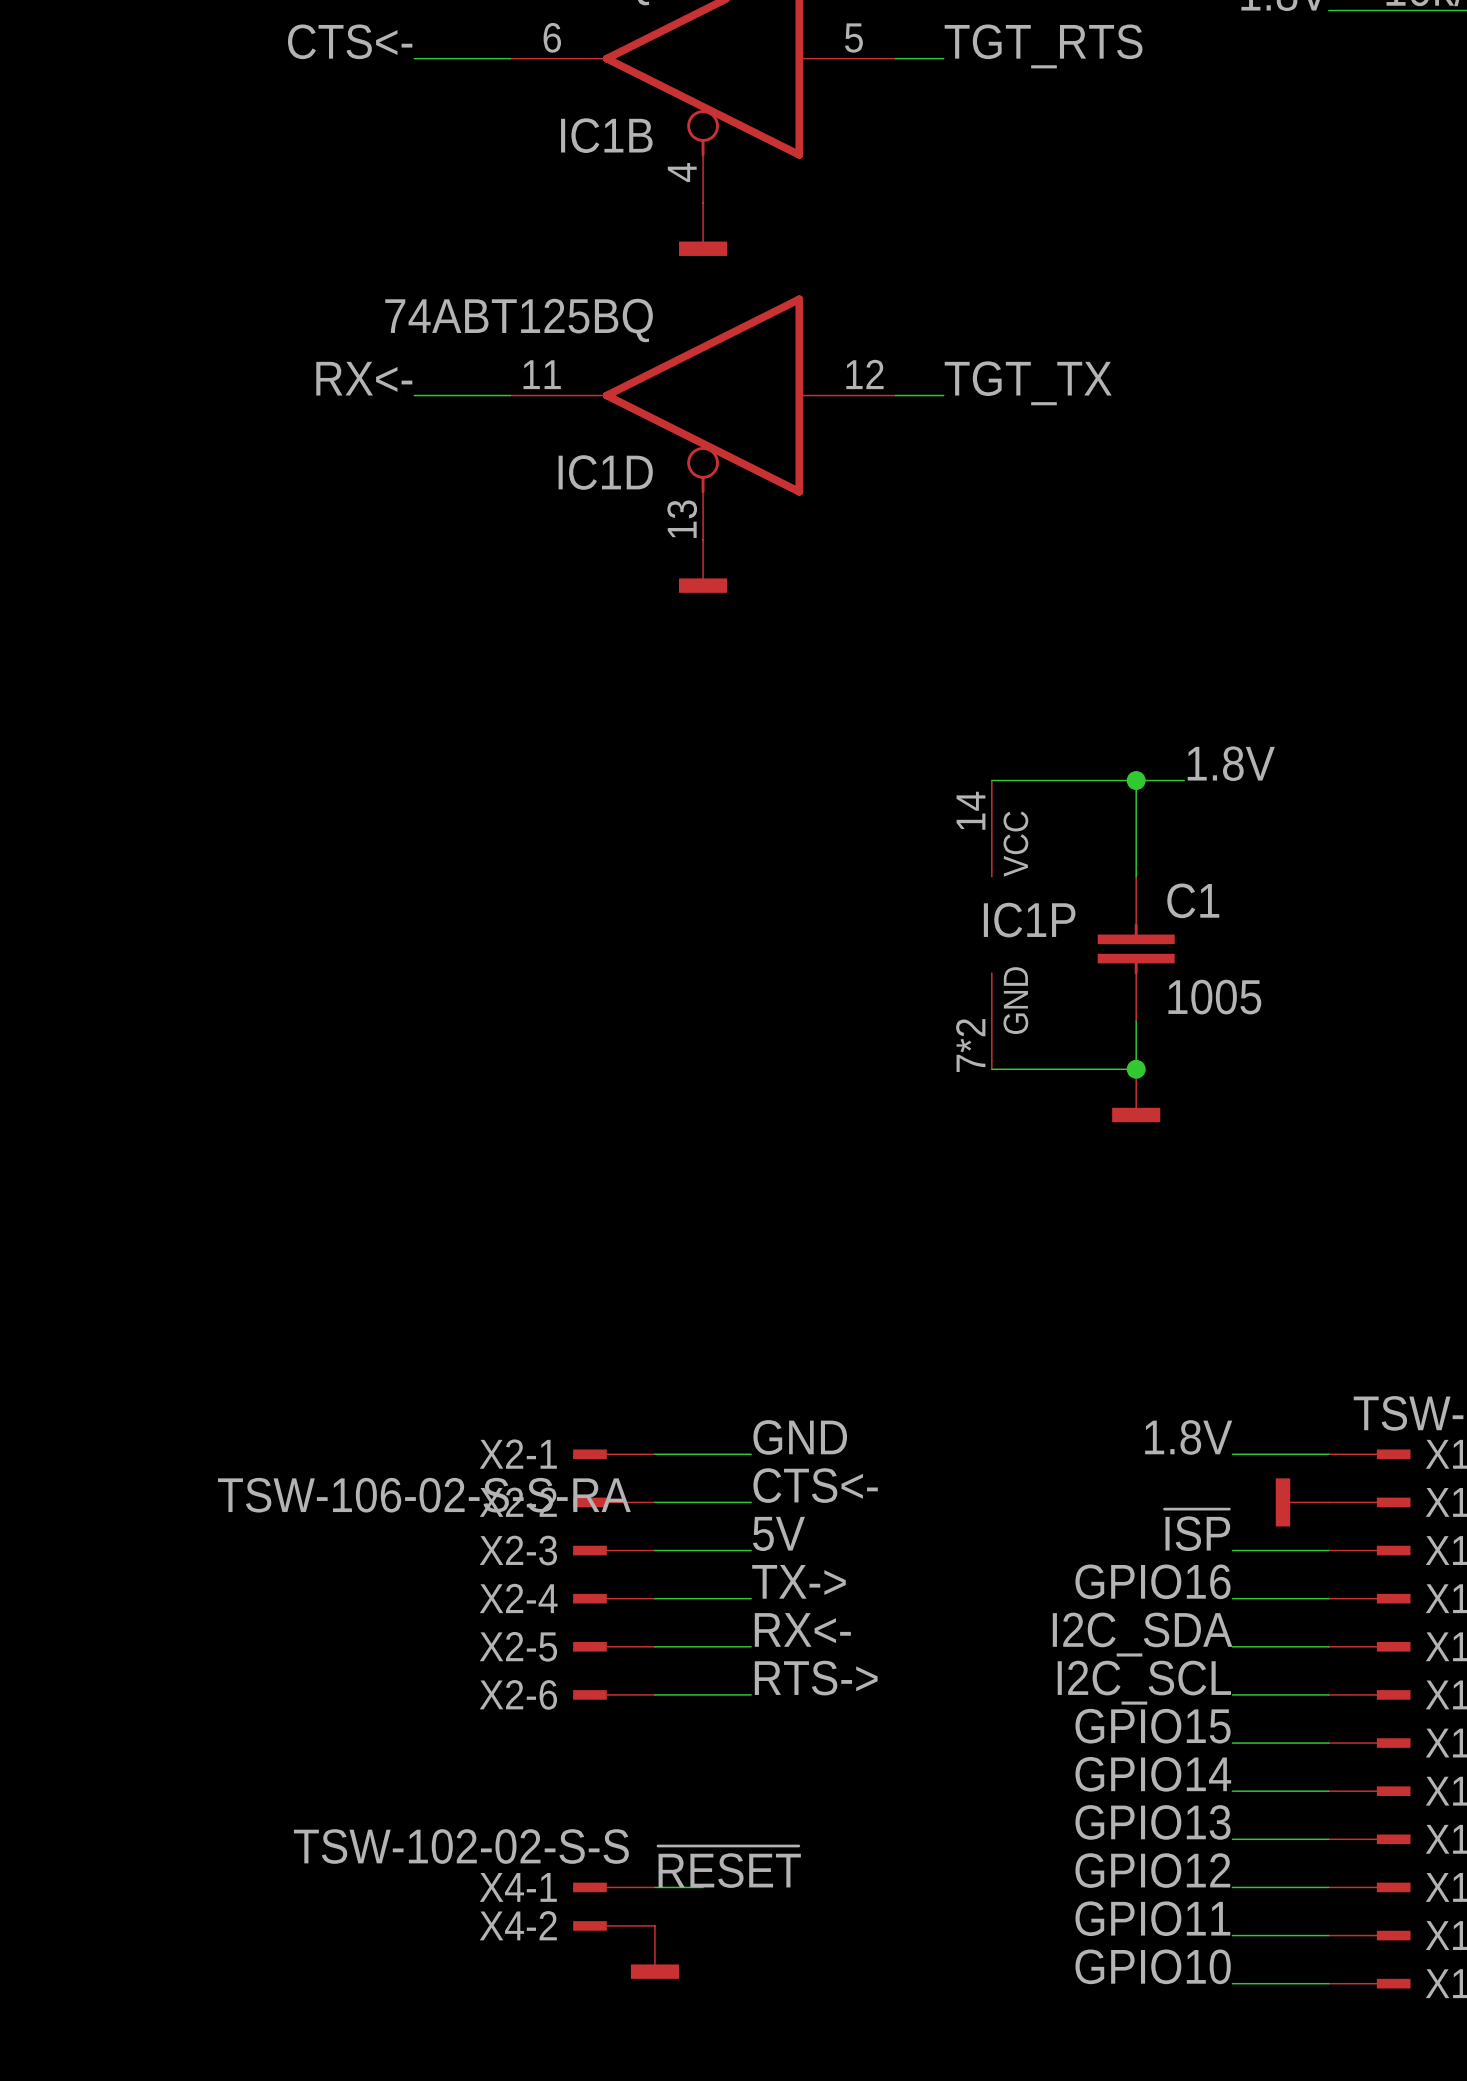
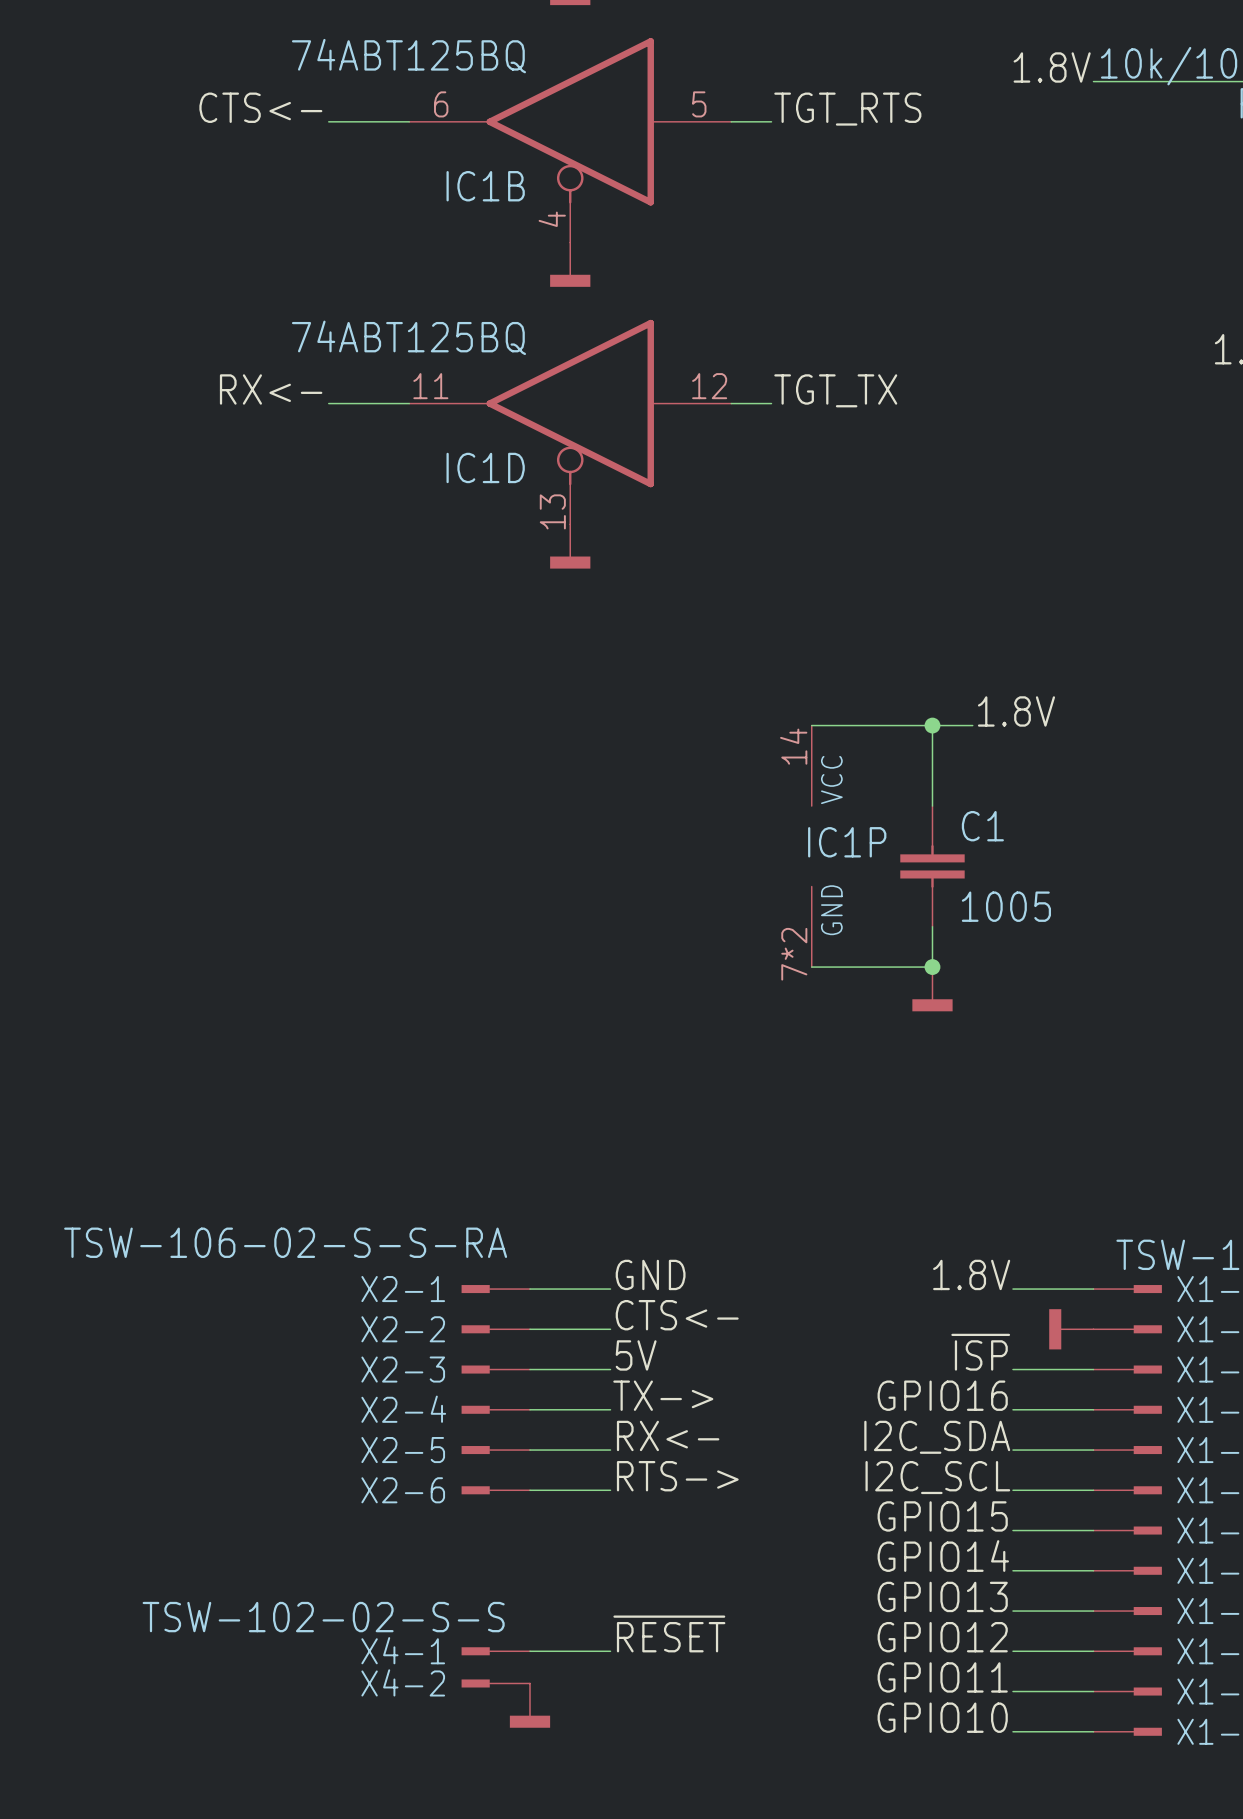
X2-1 value position: TSW-106-02-S-S-RA (424, 1495) -> TSW-106-02-S-S-RA (285, 1242)
label position: ~{RESET} (729, 1866) -> ~{RESET} (669, 1633)
wire: none -> (570, 1651) (610, 1651)

